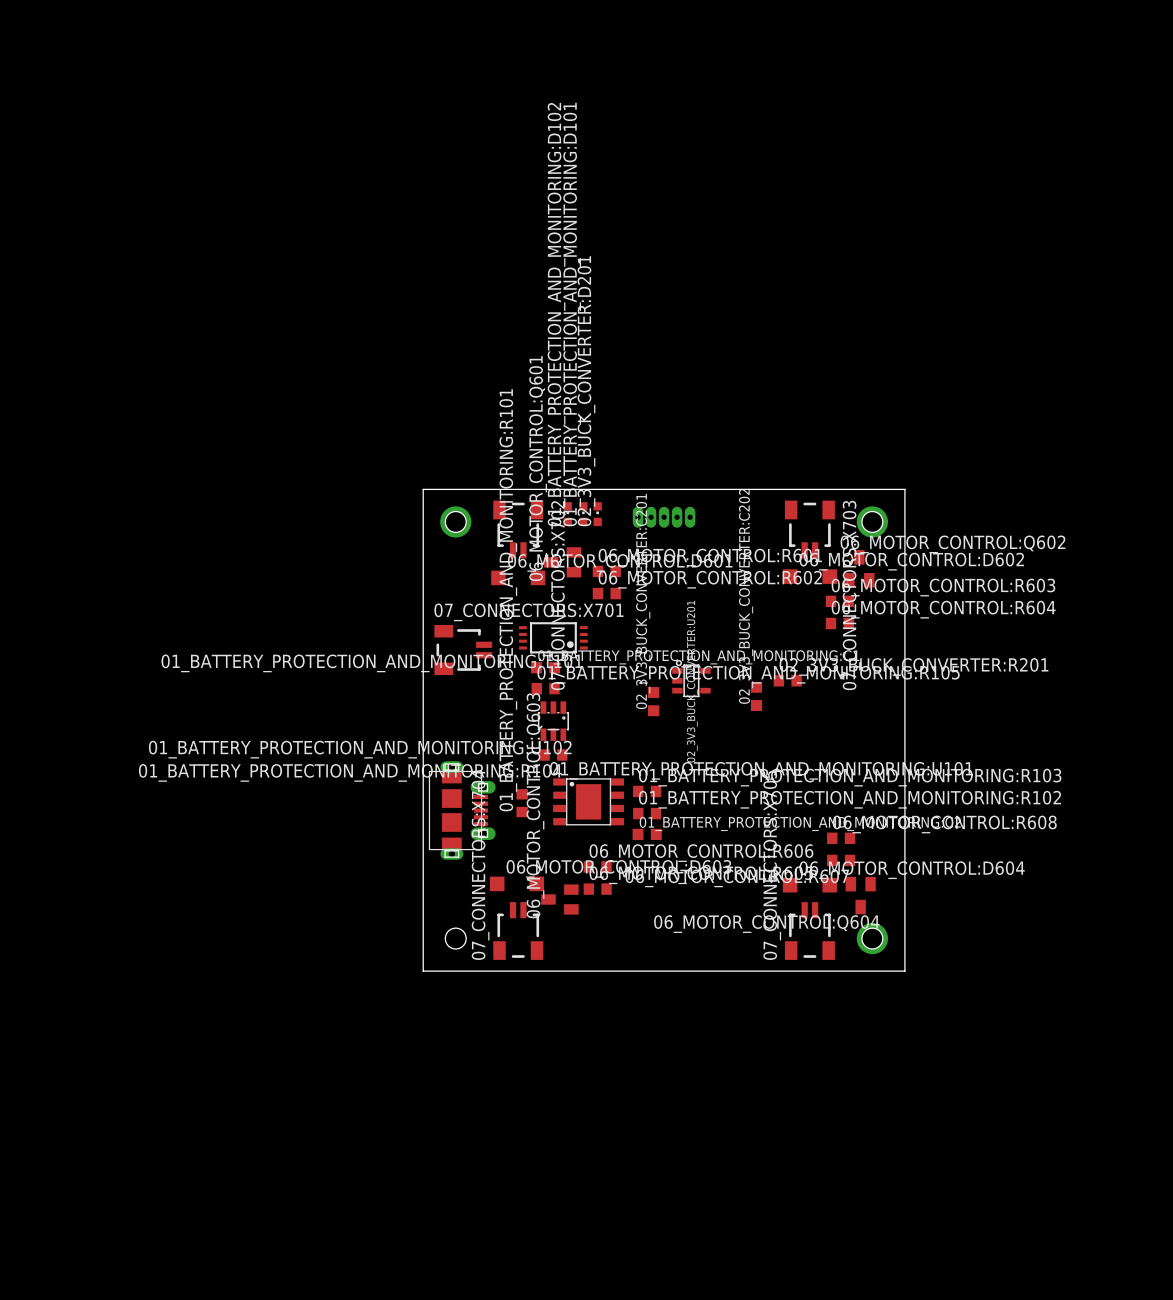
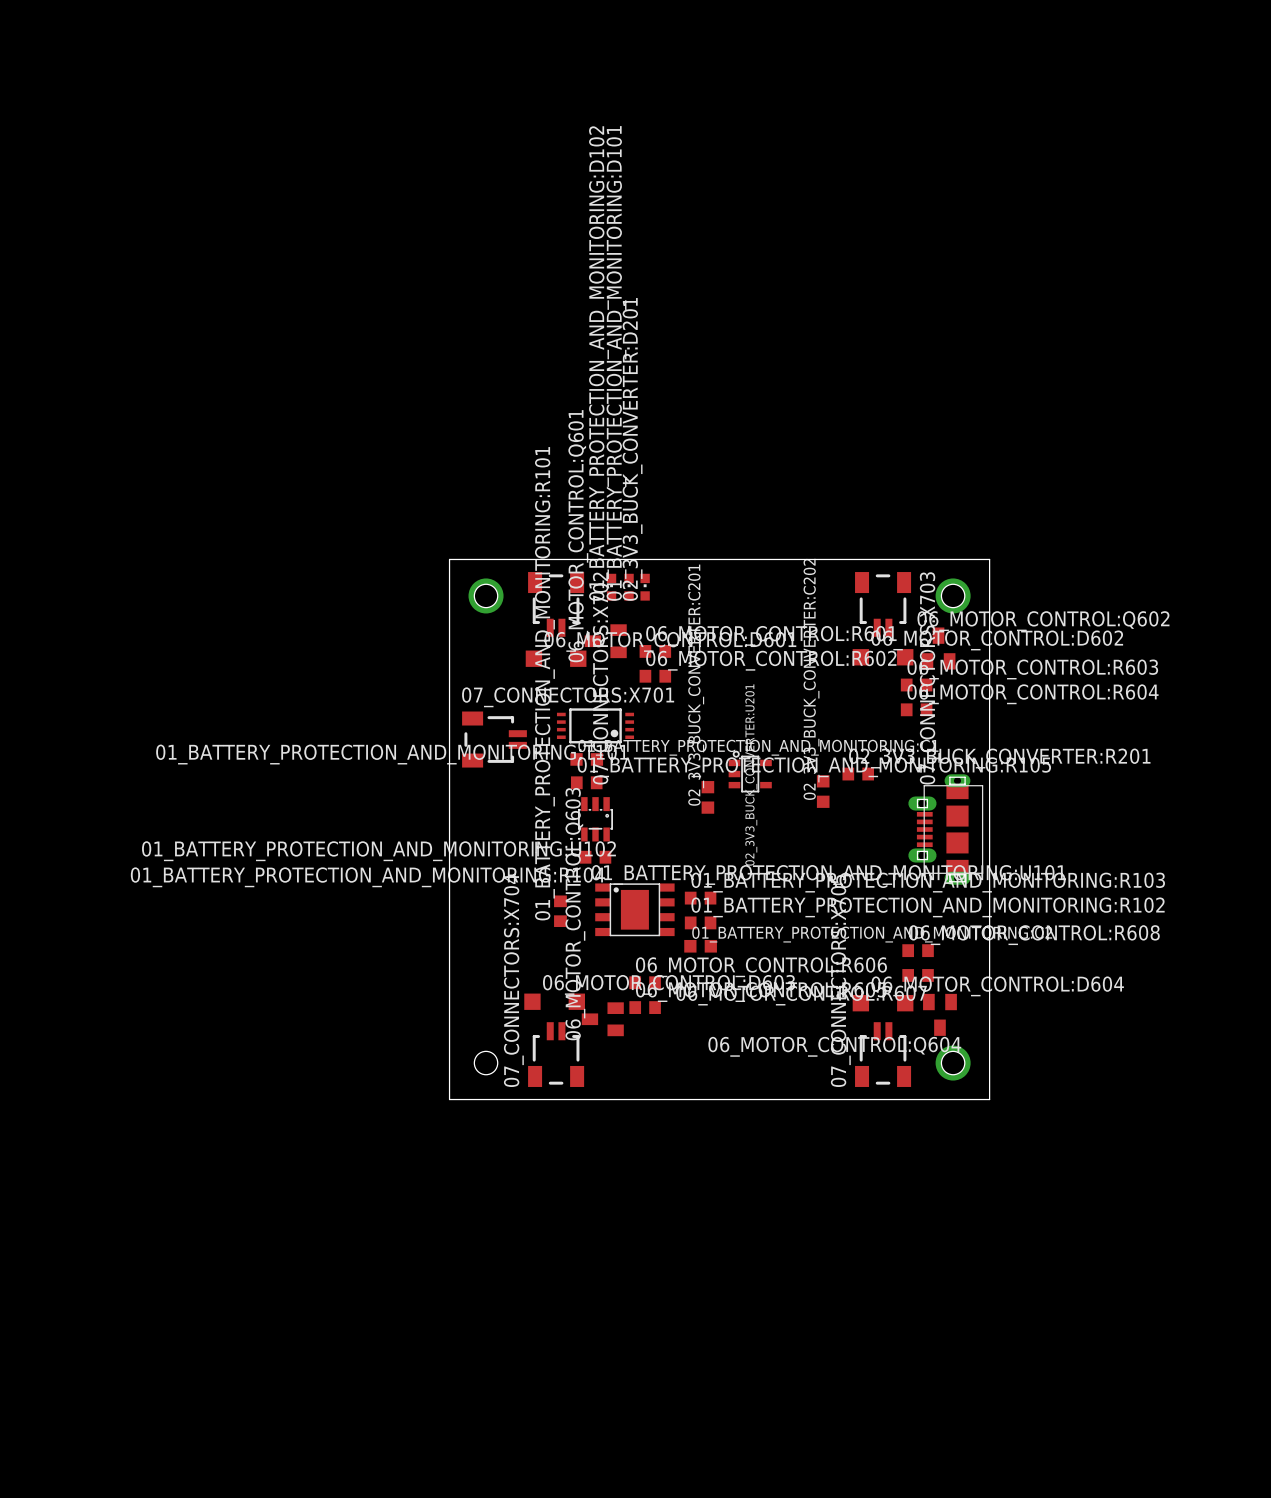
part: (664, 517) -> none
part: none -> (945, 829)
part: (462, 810) -> none

